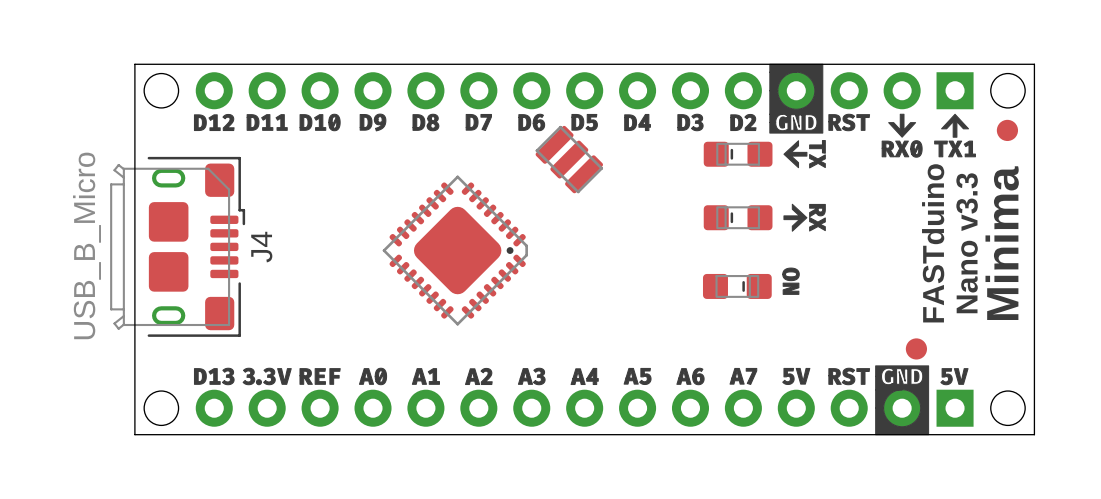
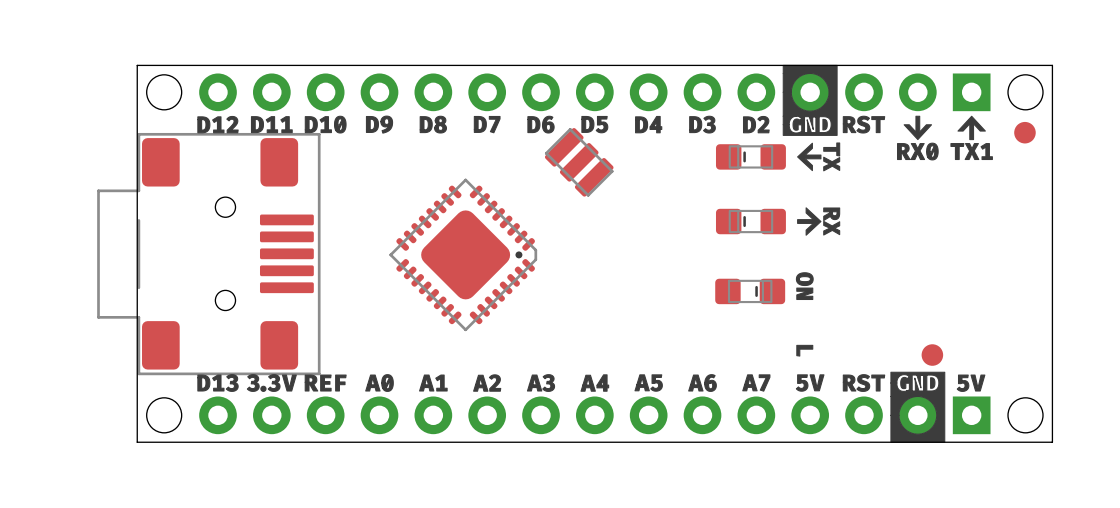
drawing shape: [193, 63, 976, 436] -> [197, 64, 993, 443]
text: FASTduino (933, 243) -> none
text: Nano v3.3 (967, 243) -> none
text: Minima (1002, 243) -> none
J4: USB_B_Micro (177, 246) -> none
part: none -> (208, 254)

